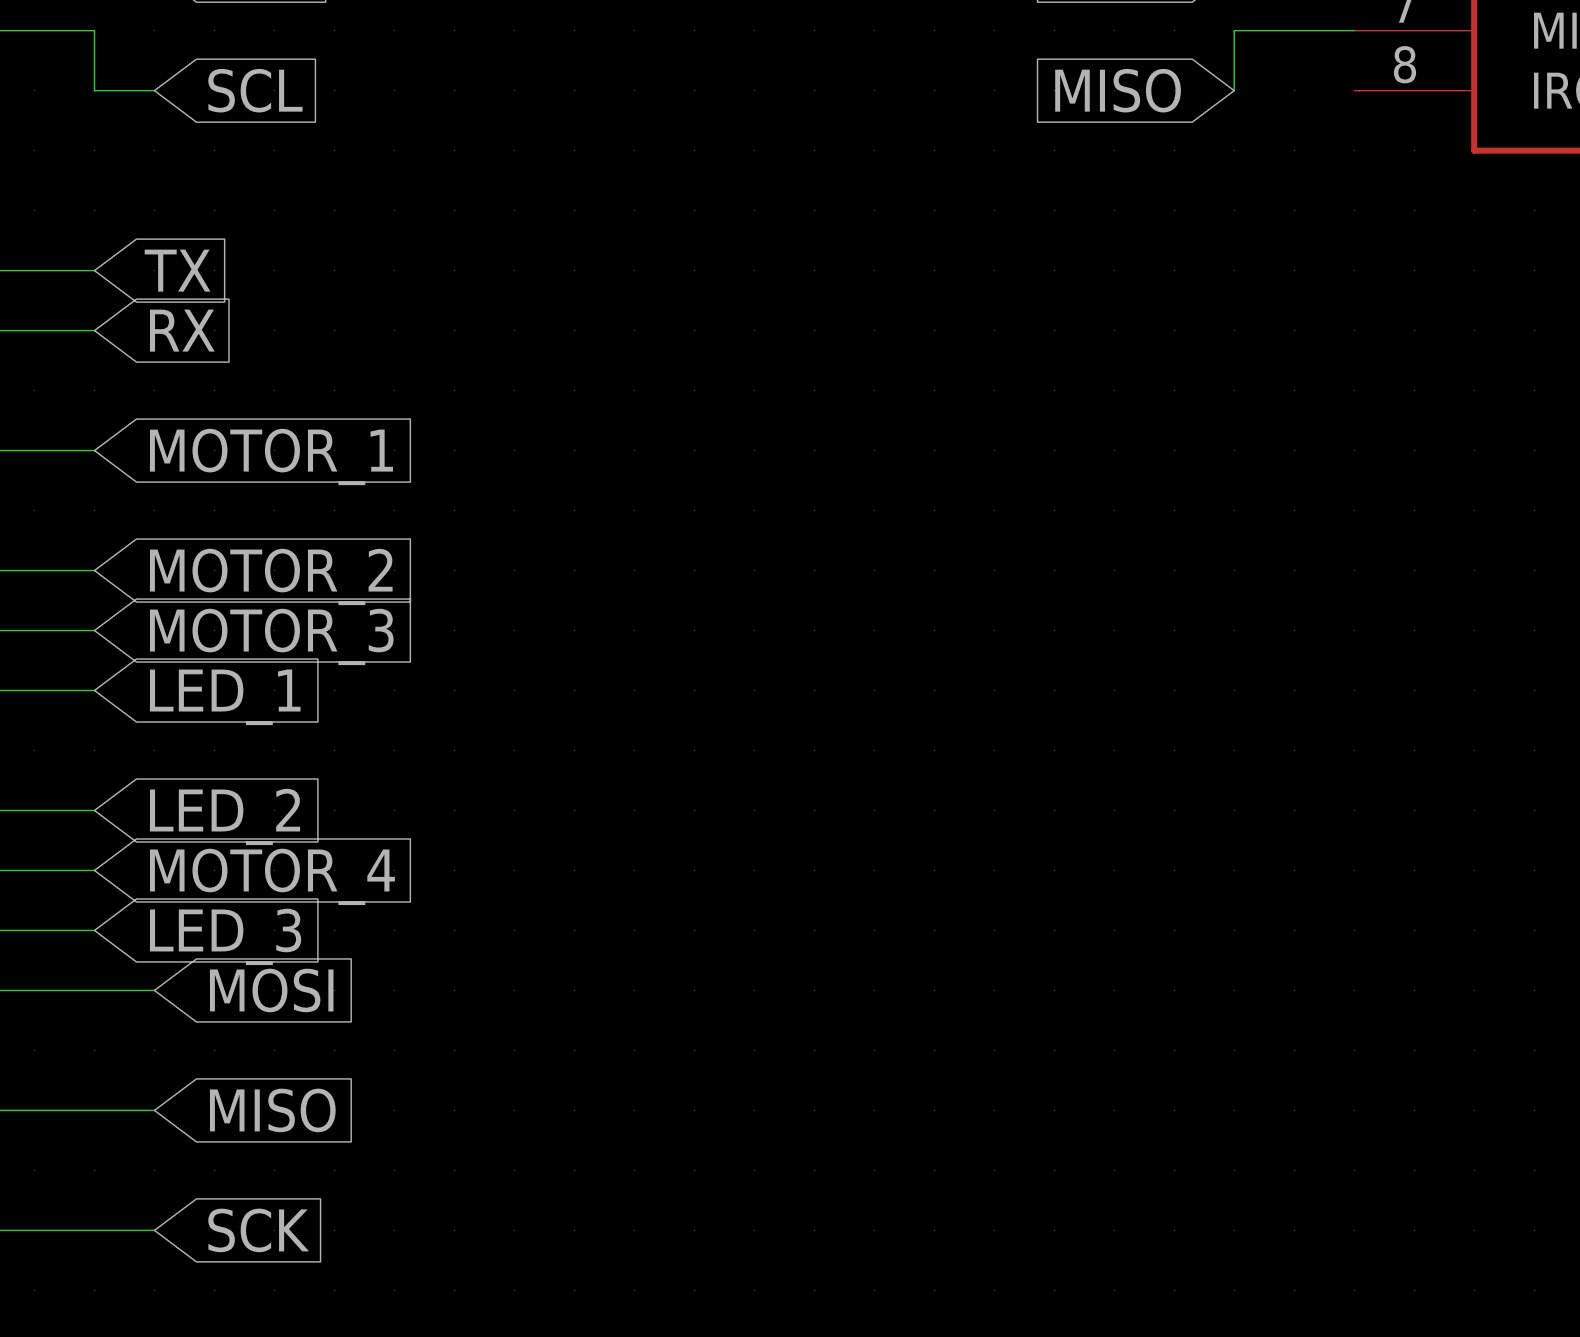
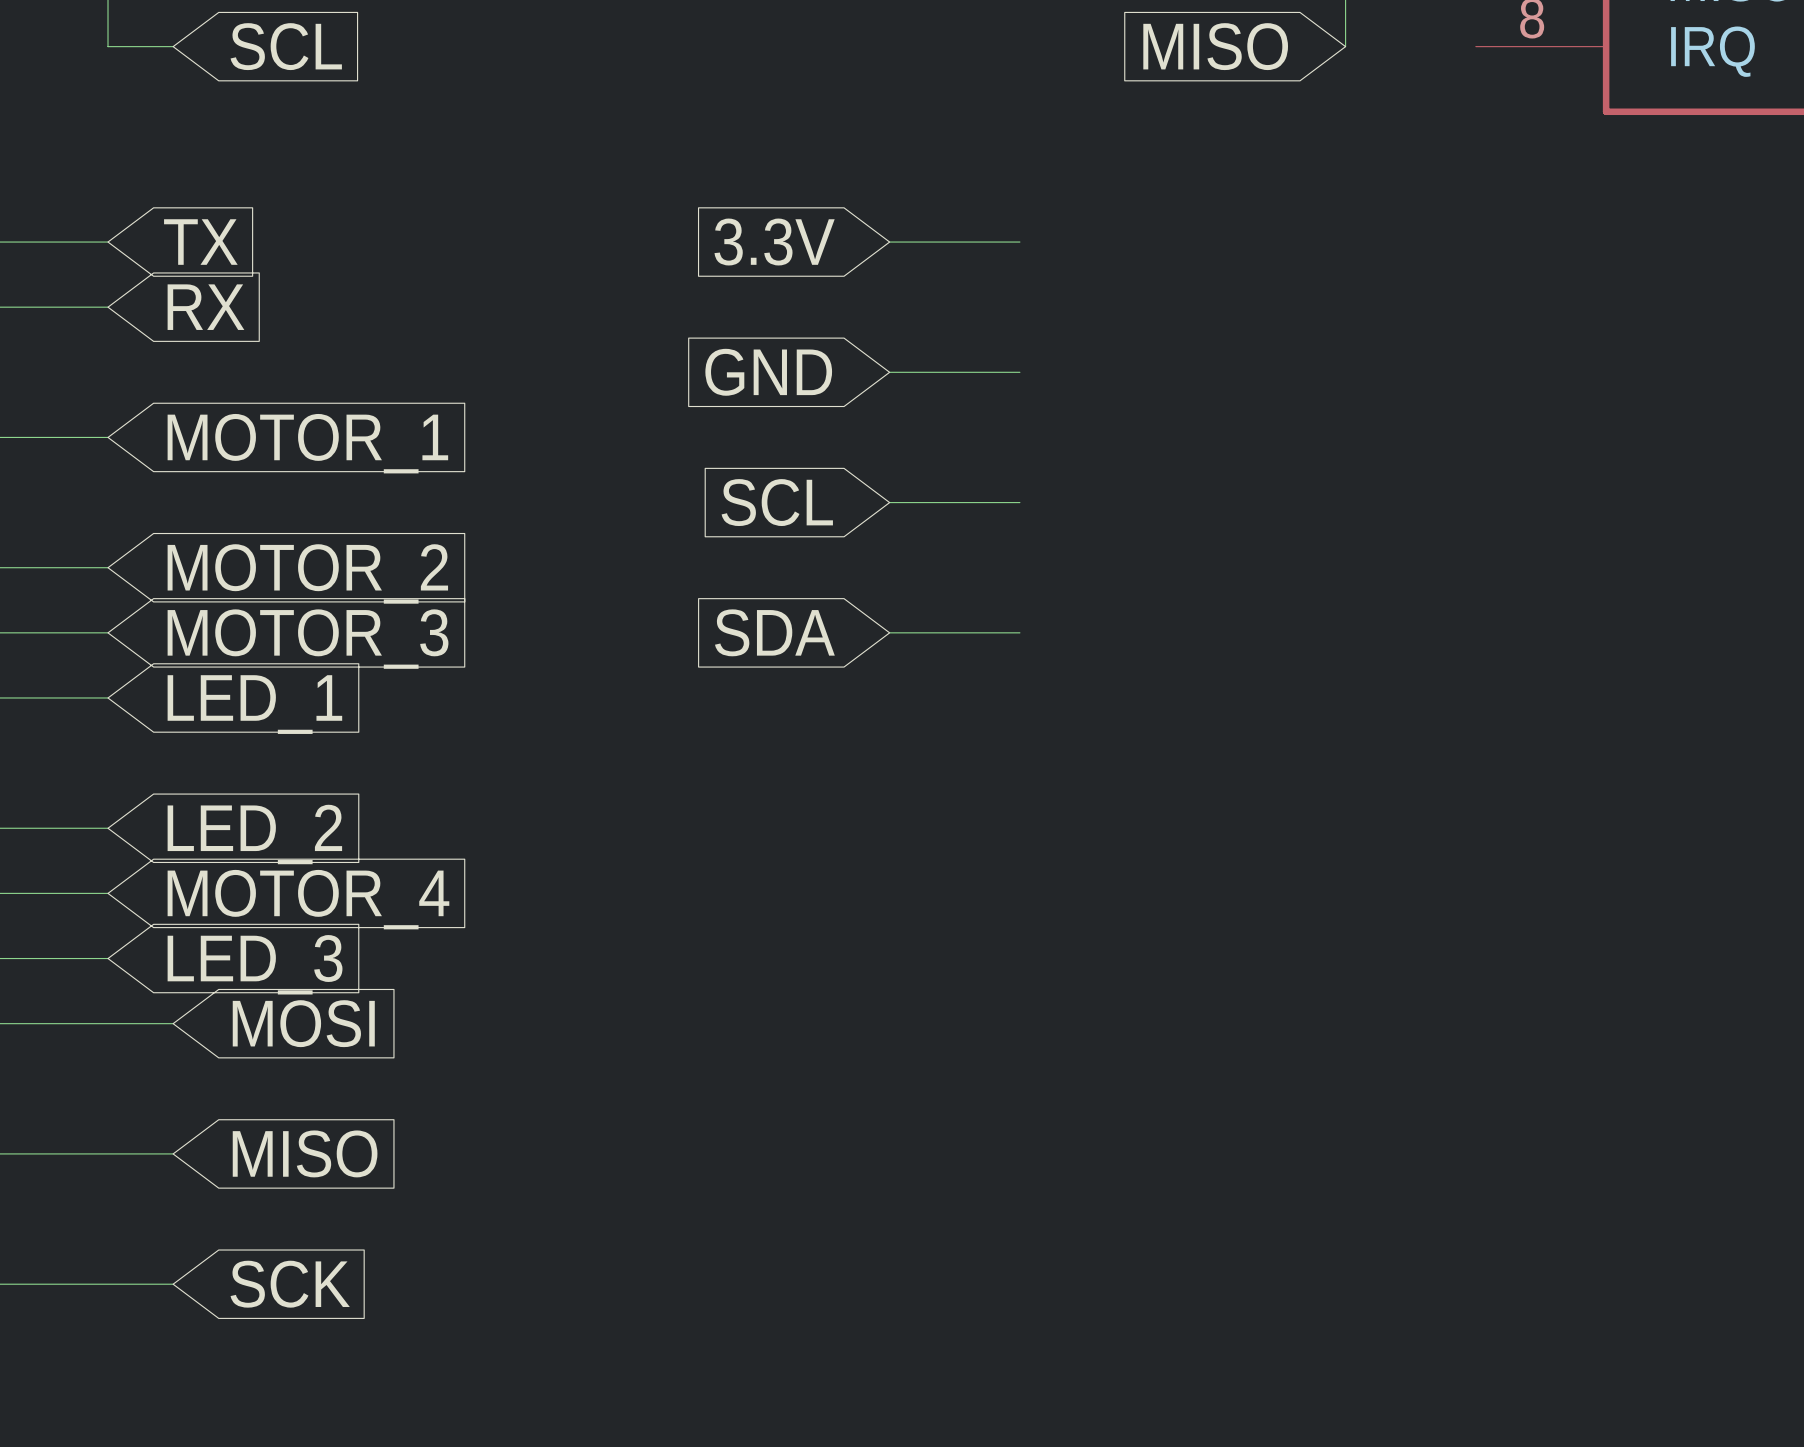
global label: none -> 3.3V (774, 242)
wire: none -> (889, 242) (1019, 242)
global label: none -> GND (768, 372)
wire: none -> (889, 372) (1019, 372)
global label: none -> SCL (777, 502)
wire: none -> (889, 502) (1019, 502)
global label: none -> SDA (774, 632)
wire: none -> (889, 632) (1019, 632)

